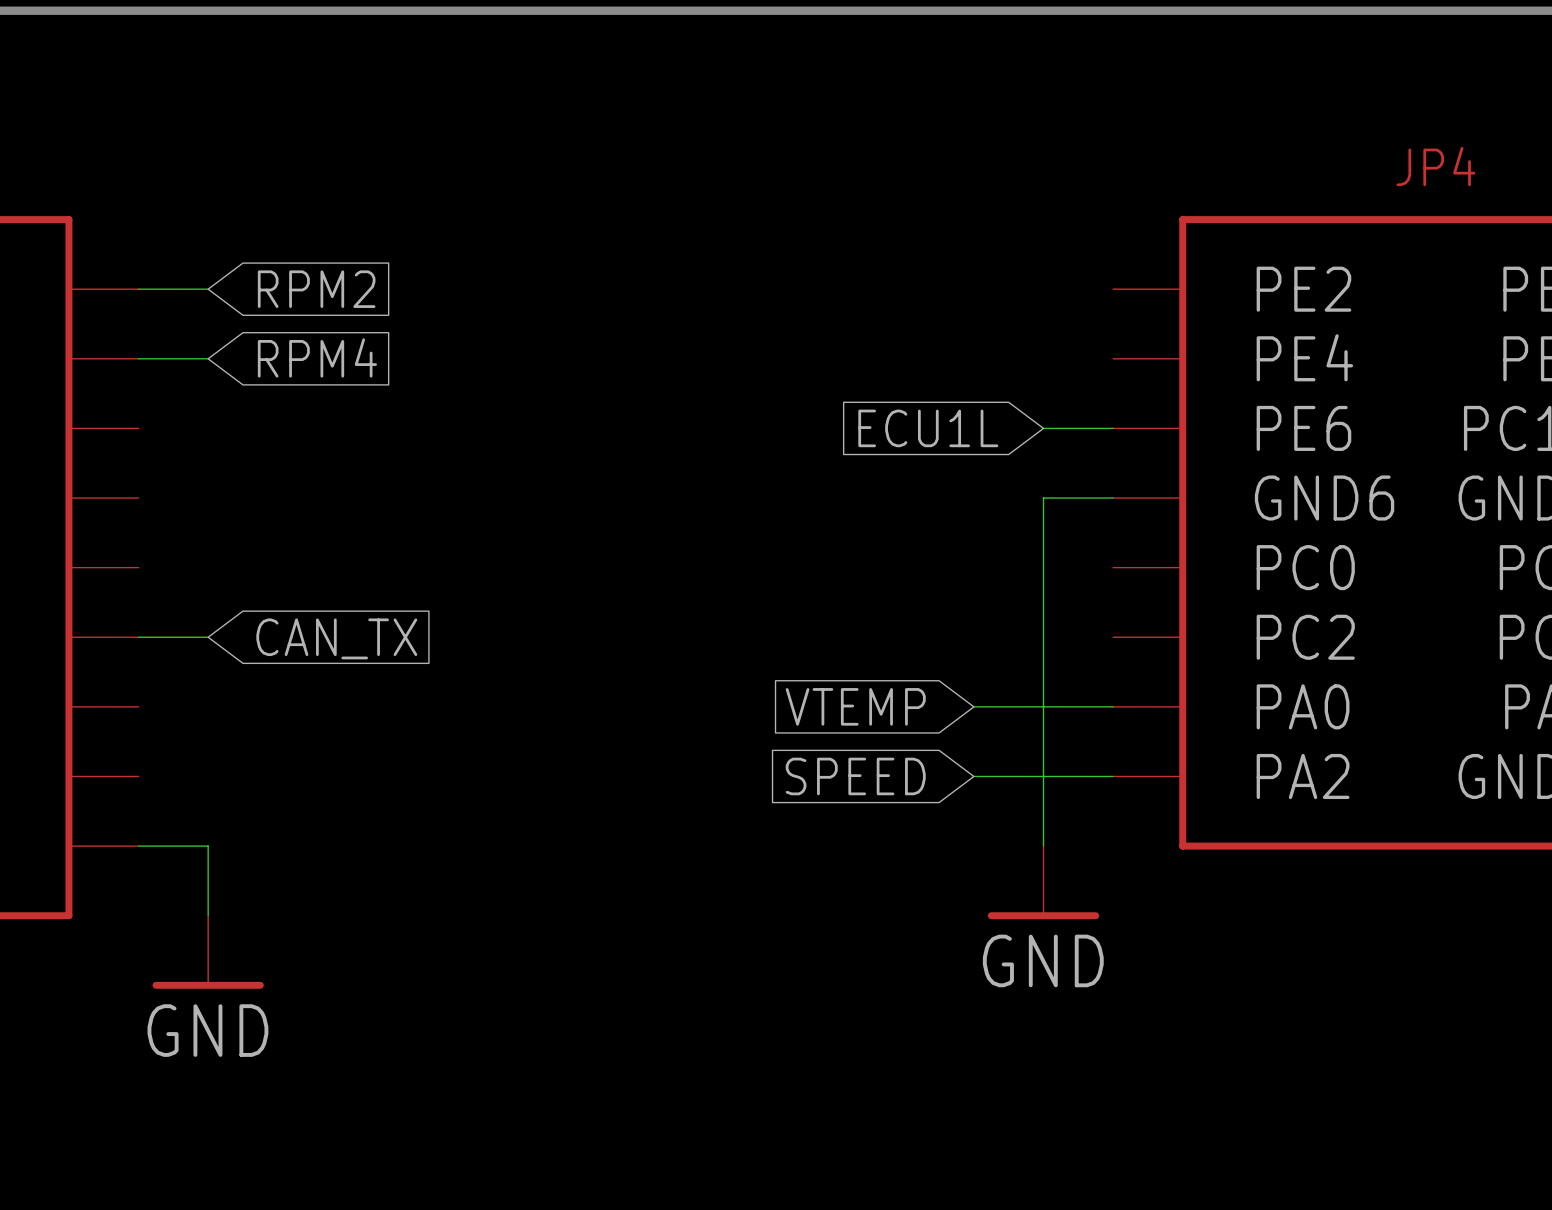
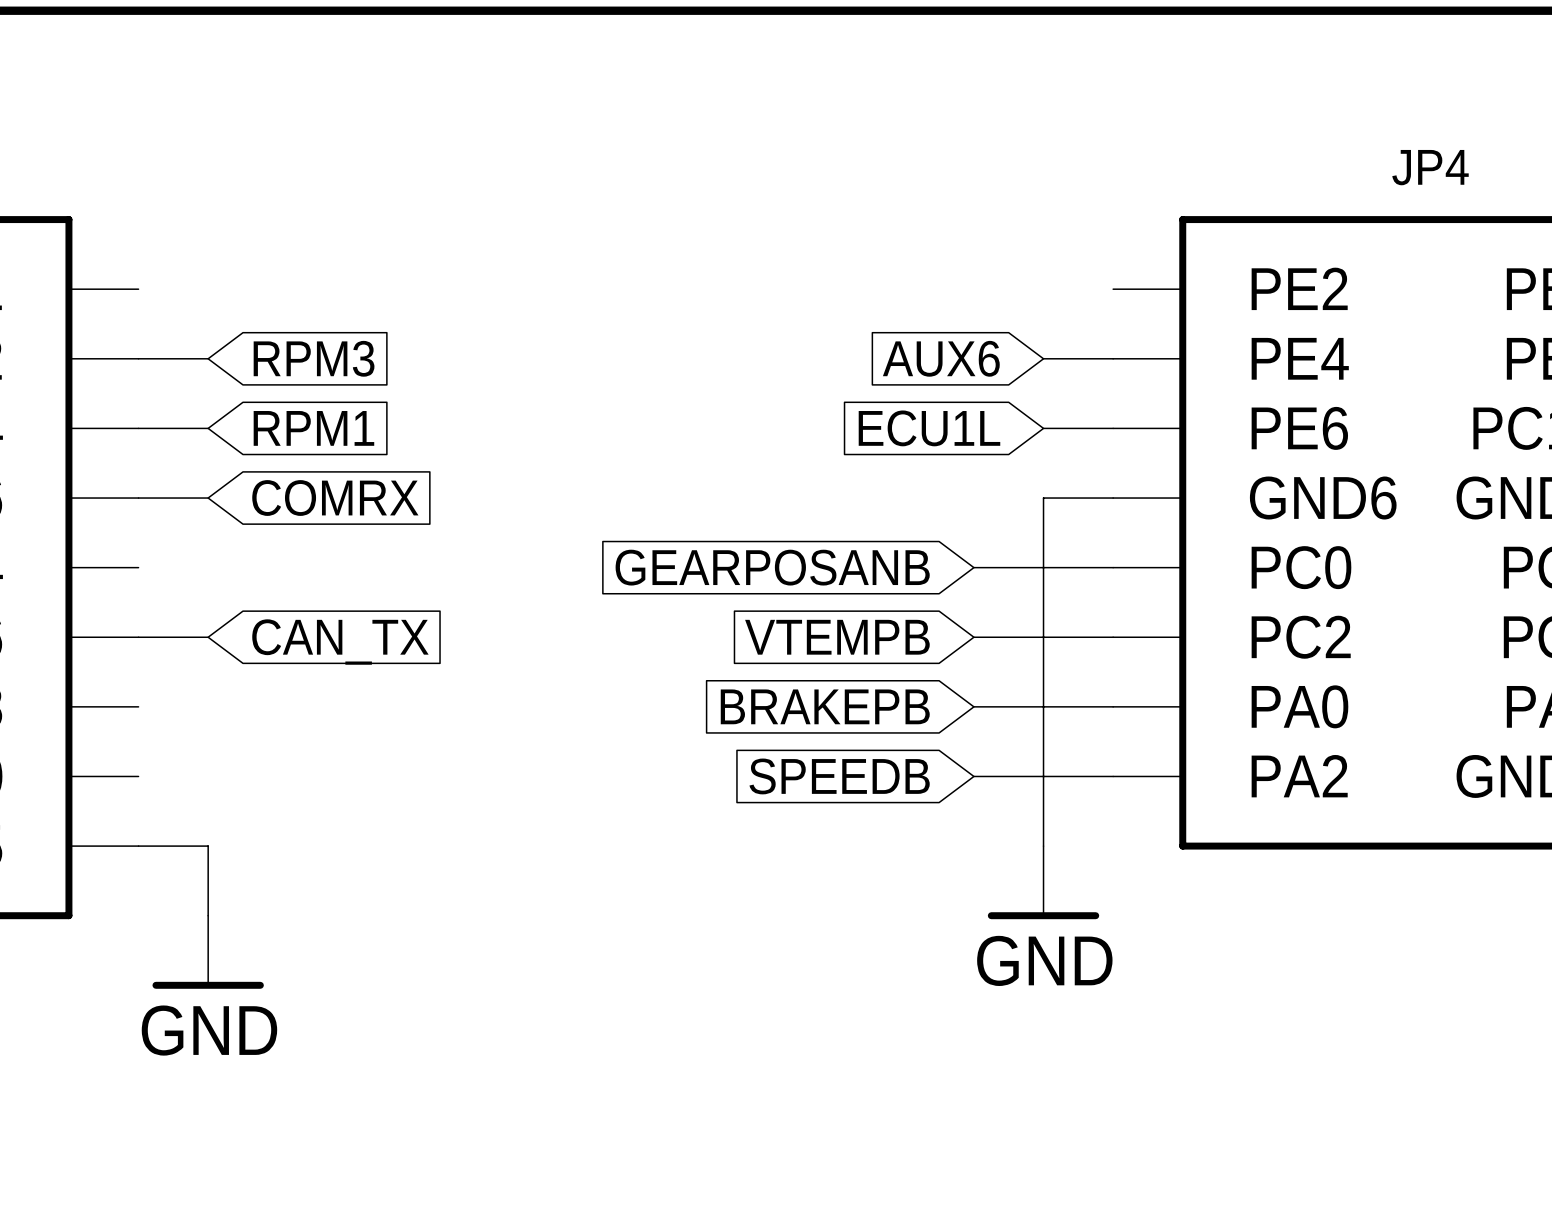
wire: (138, 289) (208, 289) -> (138, 428) (208, 428)
global label: RPM2 (316, 289) -> none
global label: RPM4 (317, 357) -> RPM3 (314, 358)
global label: none -> AUX6 (941, 358)
wire: none -> (1043, 358) (1113, 358)
global label: none -> RPM1 (313, 428)
wire: none -> (138, 498) (208, 498)
global label: none -> COMRX (335, 498)
global label: none -> GEARPOSANB (772, 567)
wire: none -> (973, 567) (1113, 567)
global label: none -> VTEMPB (837, 637)
wire: none -> (973, 637) (1113, 637)
global label: VTEMP (855, 706) -> BRAKEPB (825, 706)
global label: SPEED (855, 776) -> SPEEDB (839, 776)

